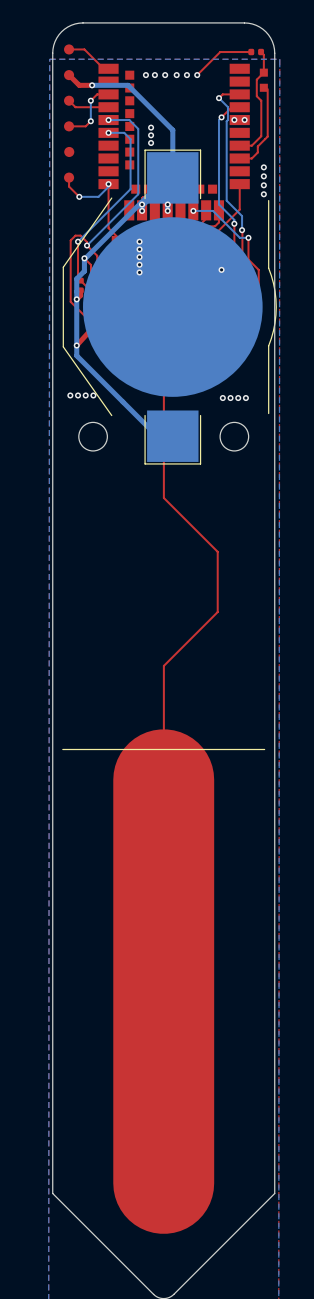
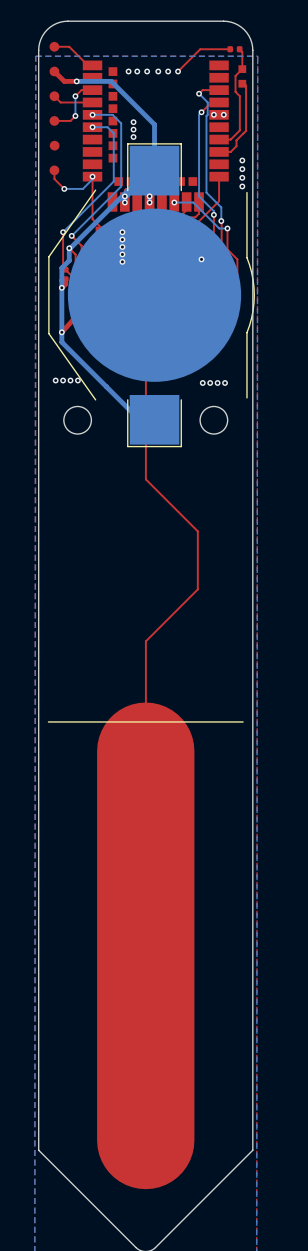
top track: (86, 245) (86, 242) (80, 235) (75, 235) (70, 240) (70, 301) (86, 317) (97, 317) -> none

